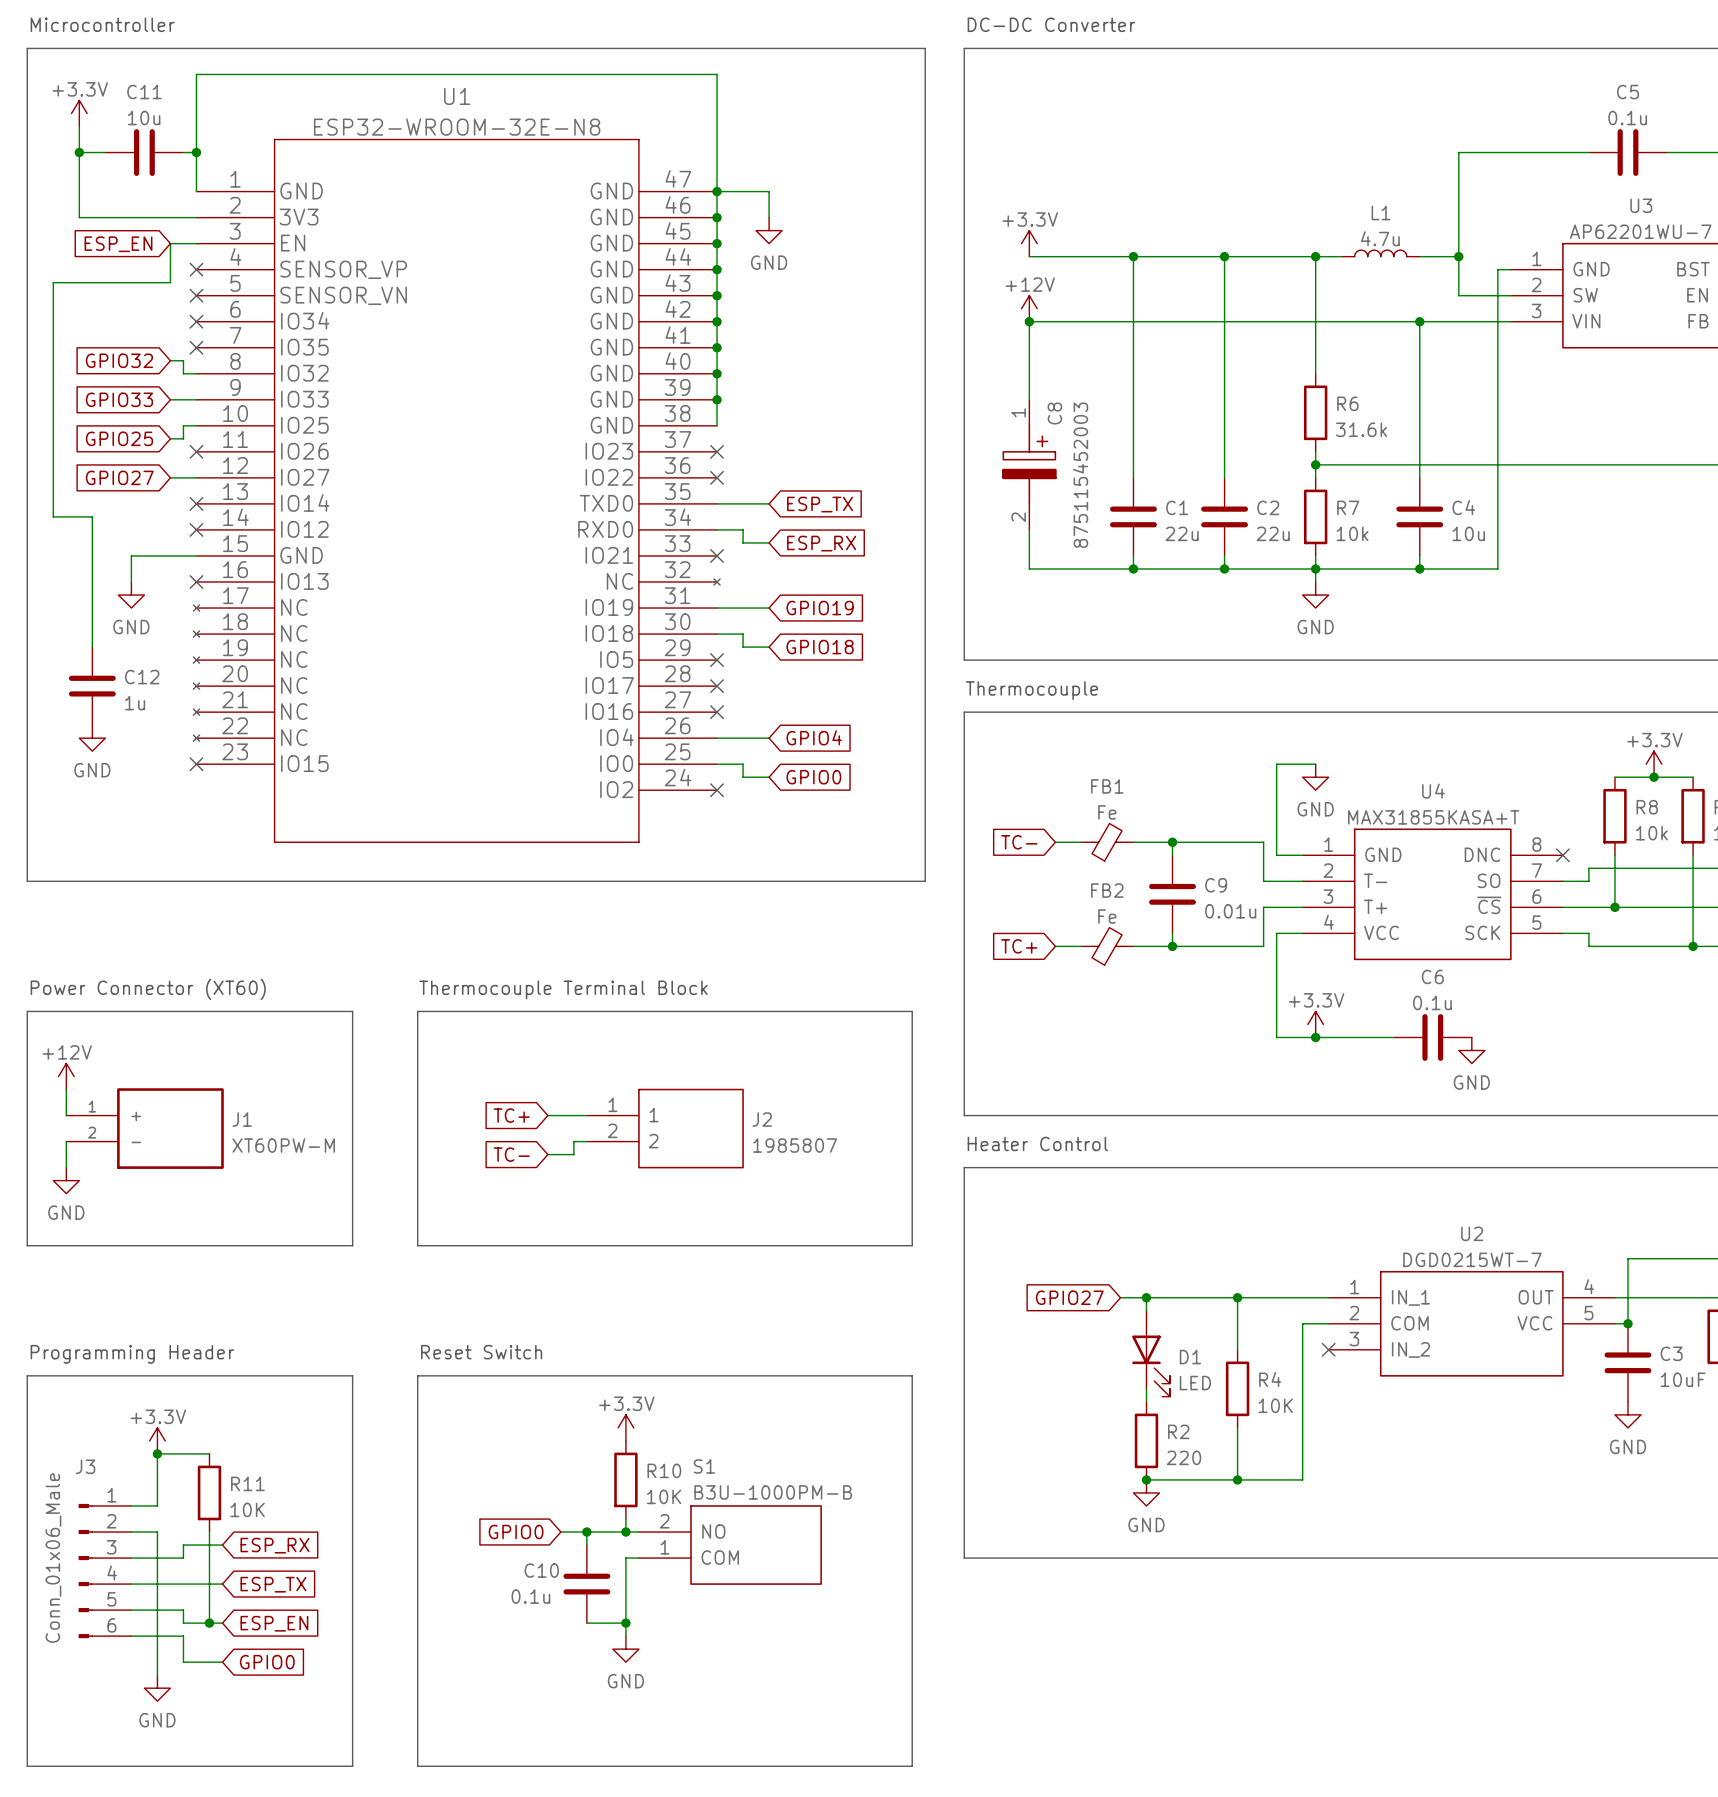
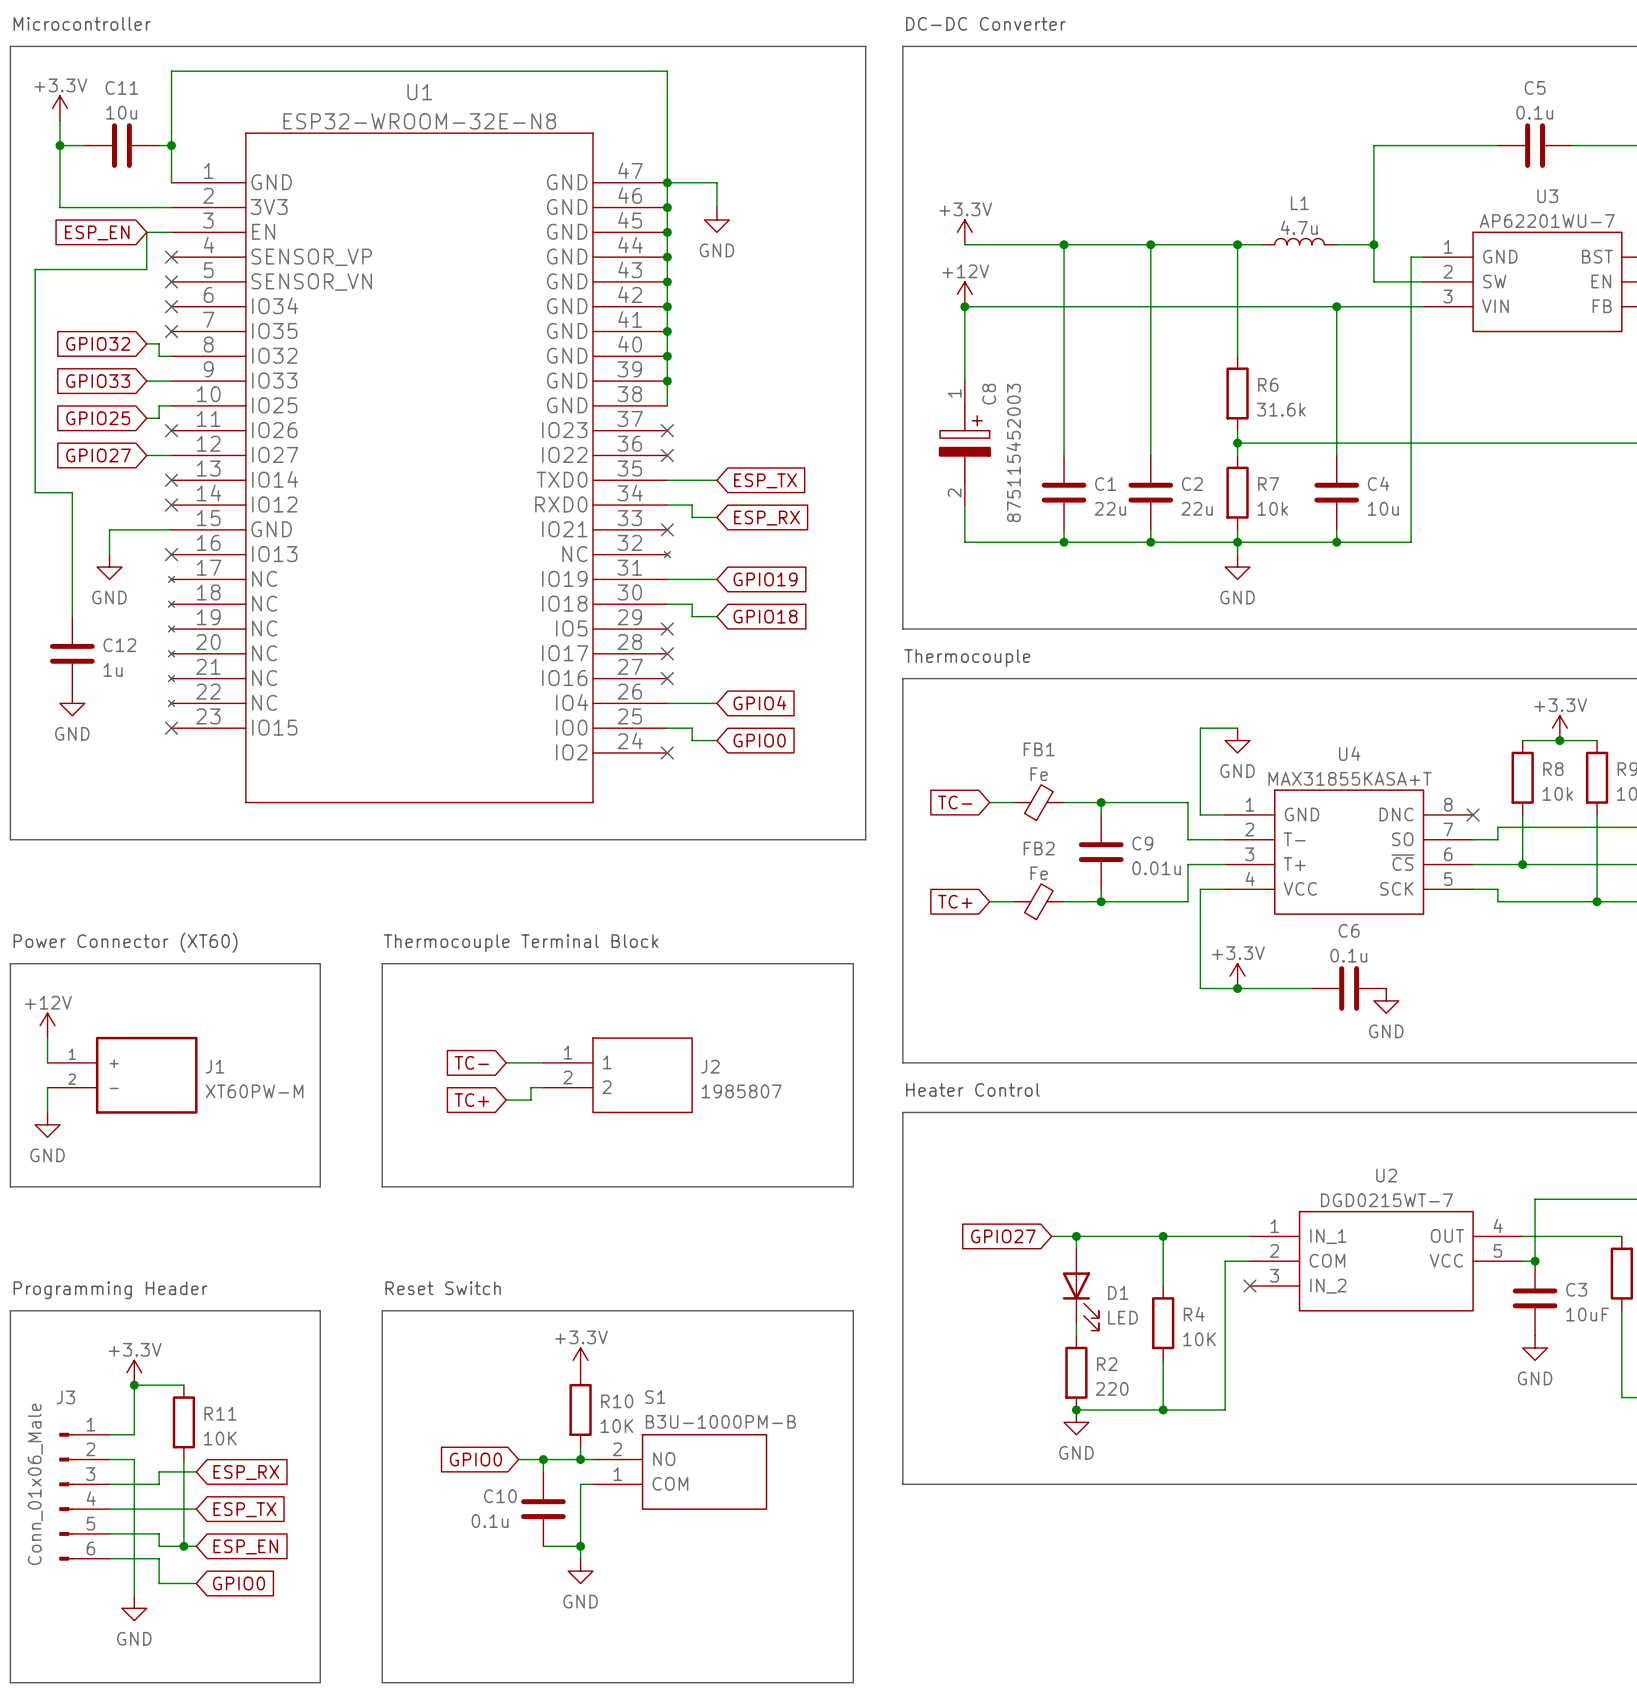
global label: TC+ (511, 1115) -> TC- (471, 1062)
global label: TC- (511, 1154) -> TC+ (471, 1100)

